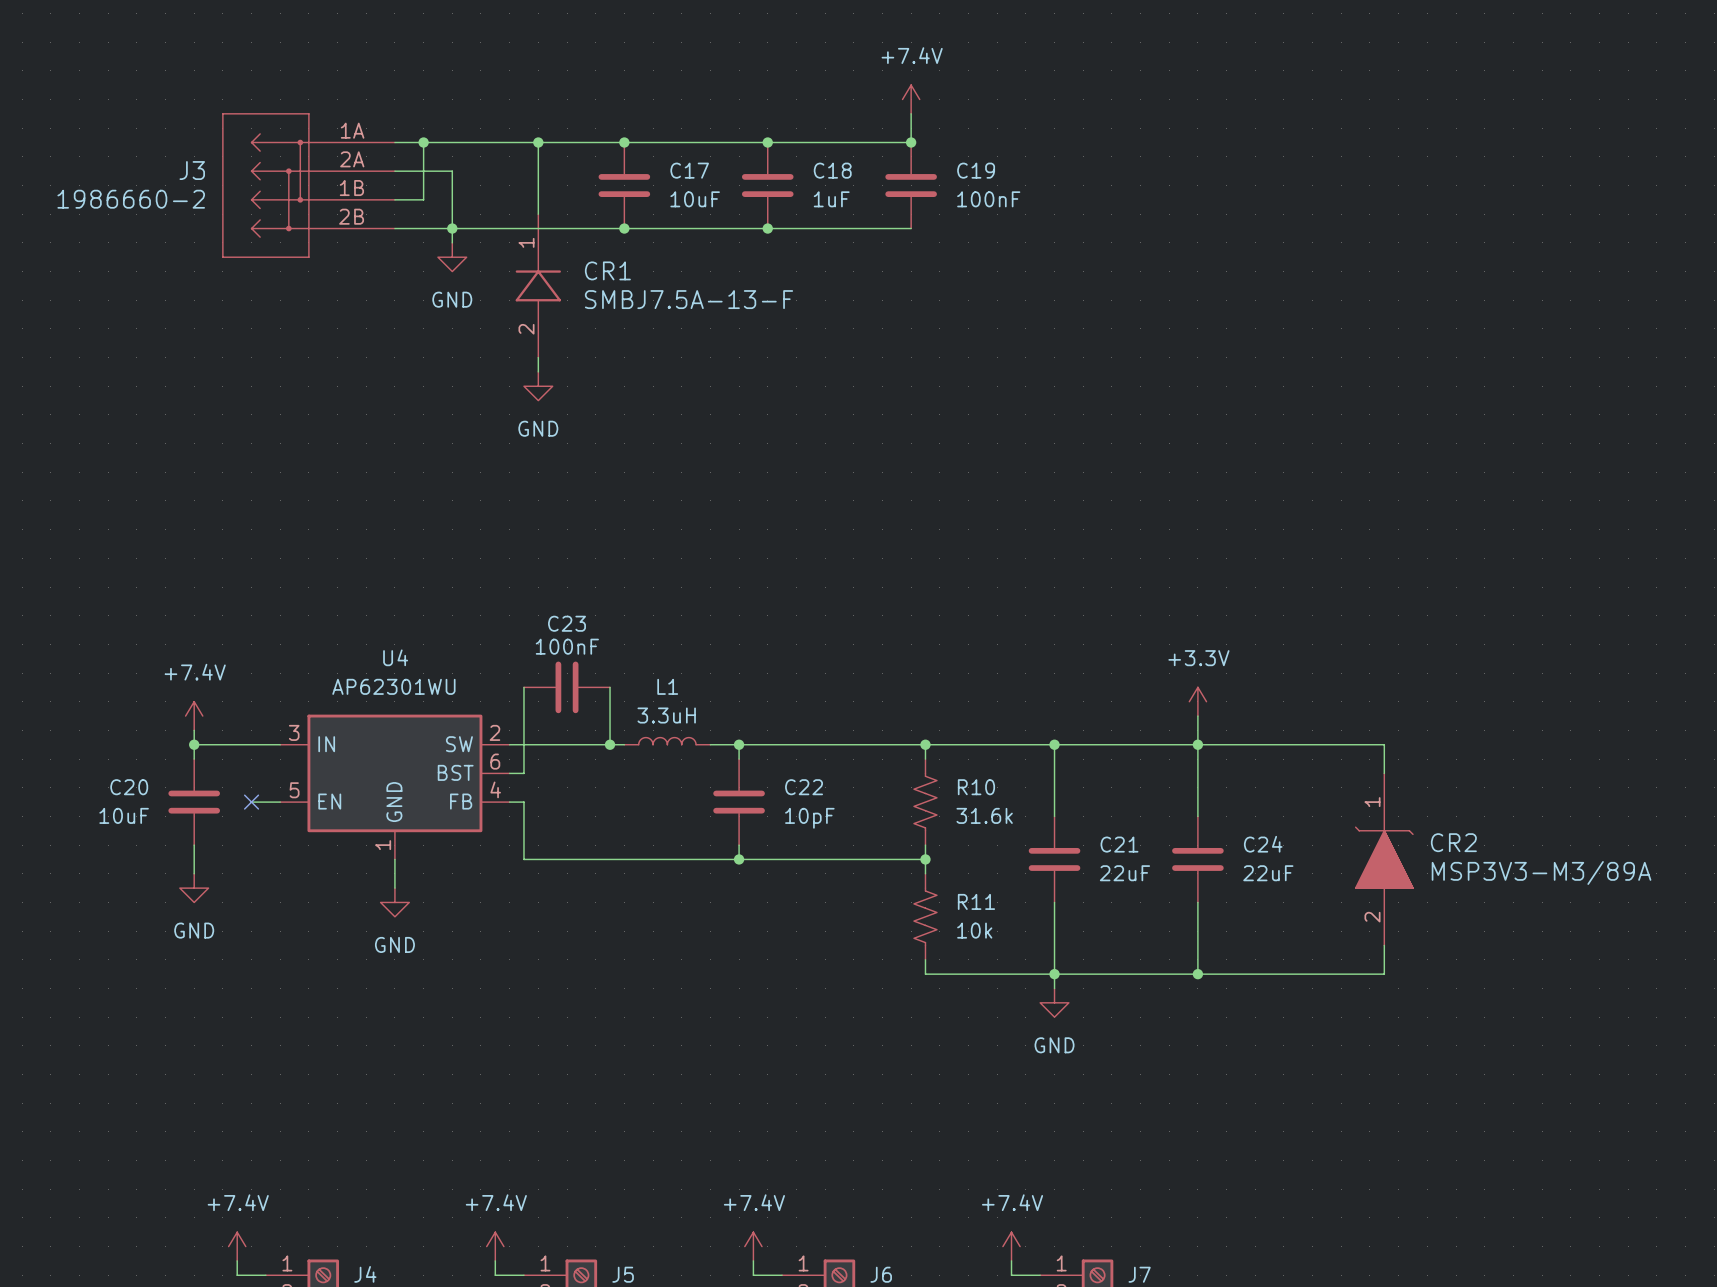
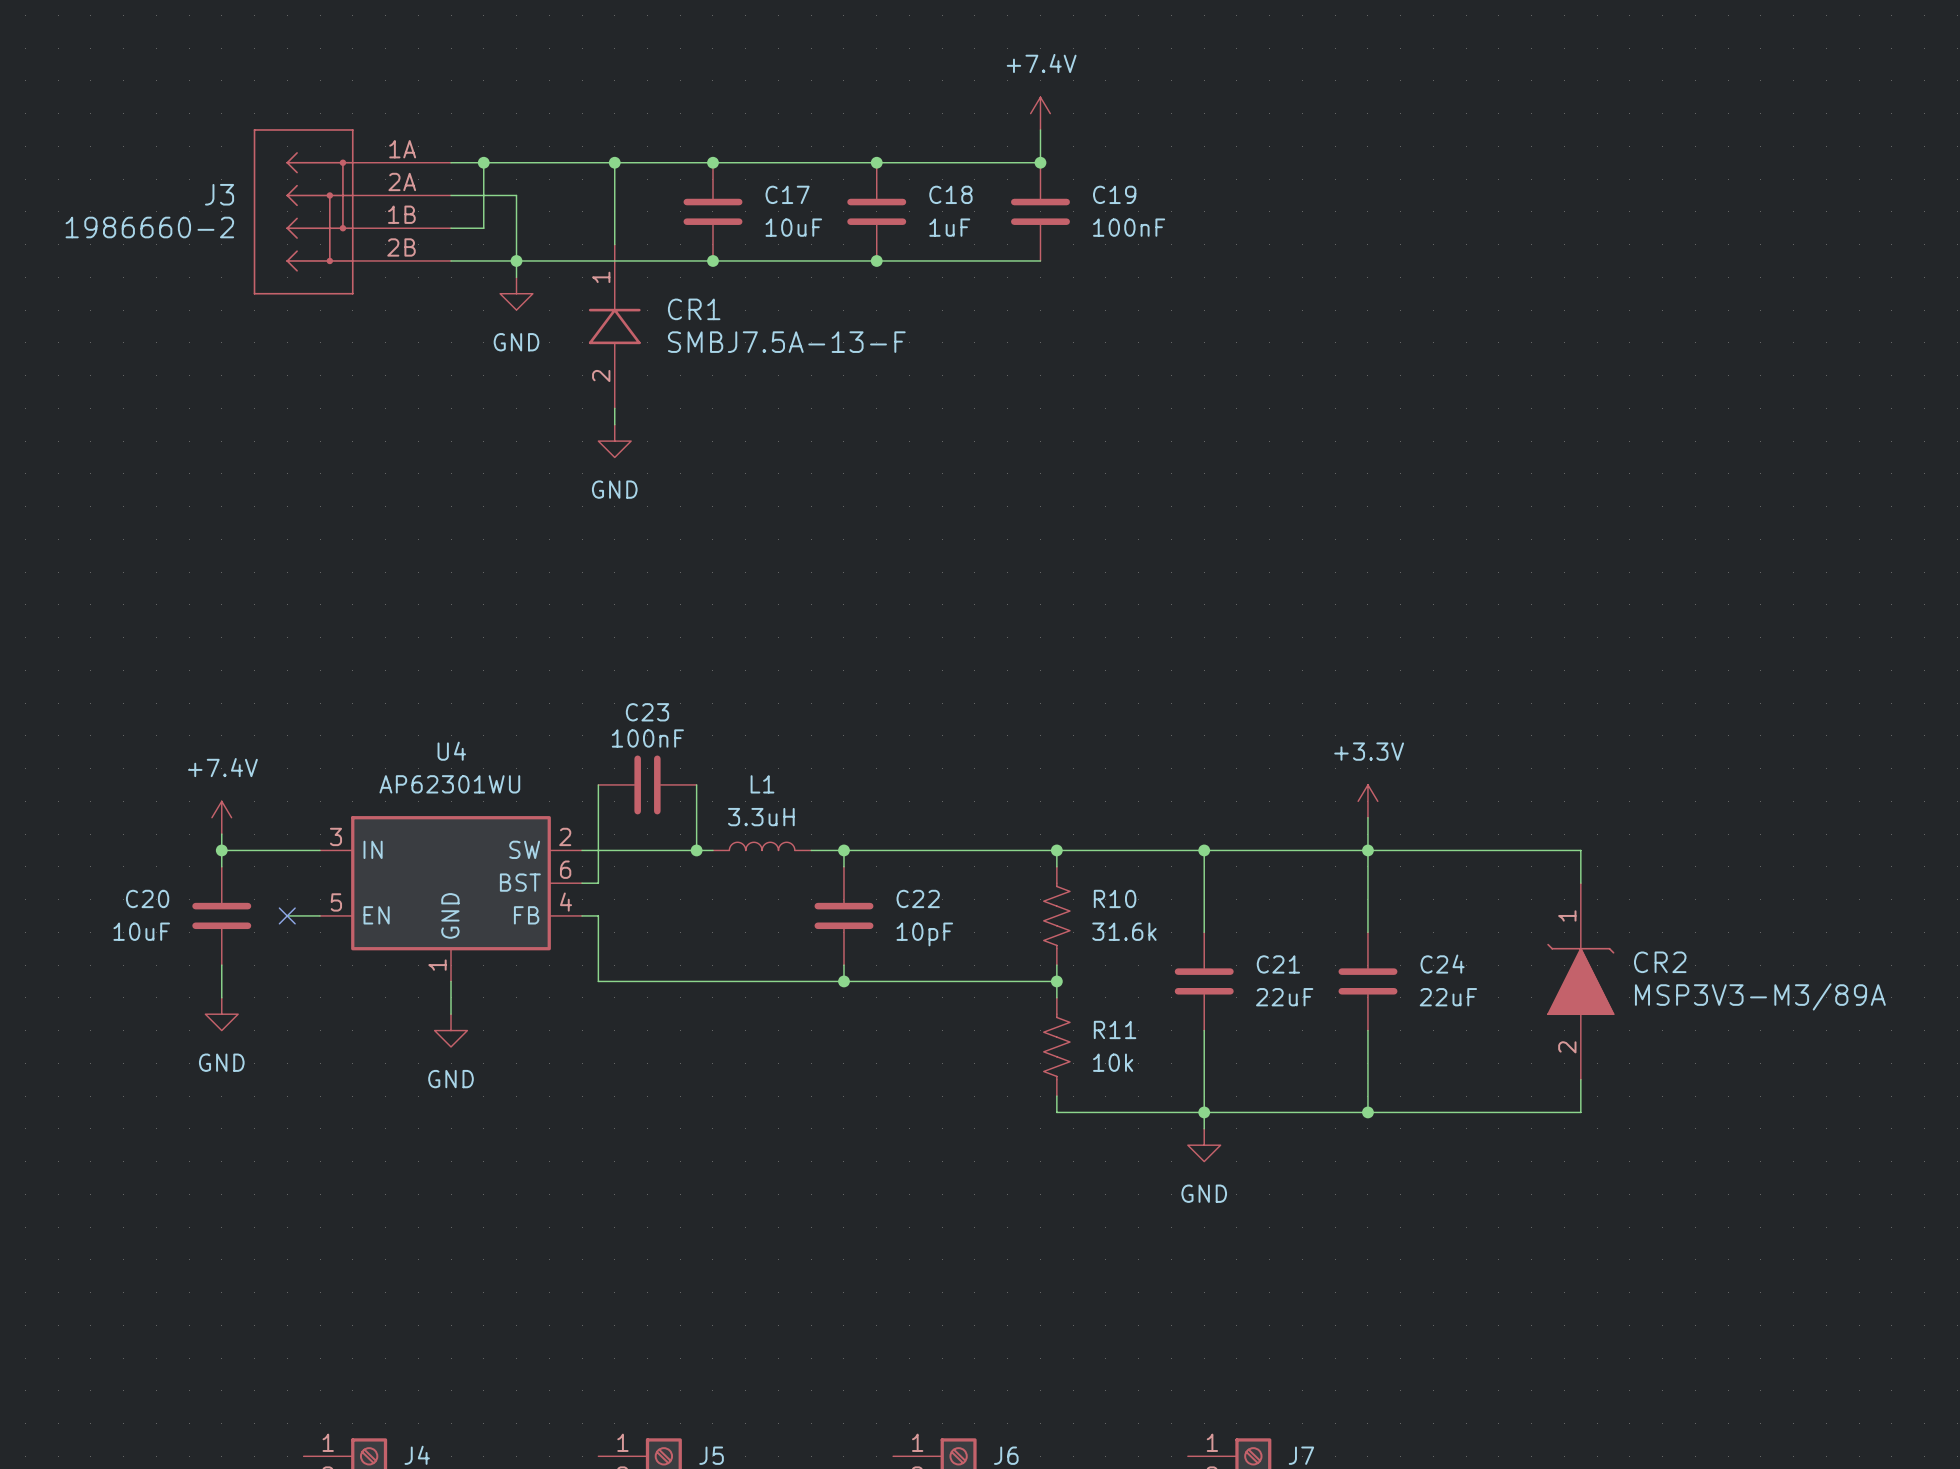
power symbol: +7.4V (237, 1246) -> none
power symbol: +7.4V (495, 1246) -> none
power symbol: +7.4V (753, 1246) -> none
power symbol: +7.4V (1011, 1246) -> none
wire: (237, 1260) (237, 1275) (265, 1275) -> none
wire: (495, 1260) (495, 1275) (523, 1275) -> none
wire: (753, 1260) (753, 1275) (782, 1275) -> none
wire: (1011, 1260) (1011, 1275) (1040, 1275) -> none

